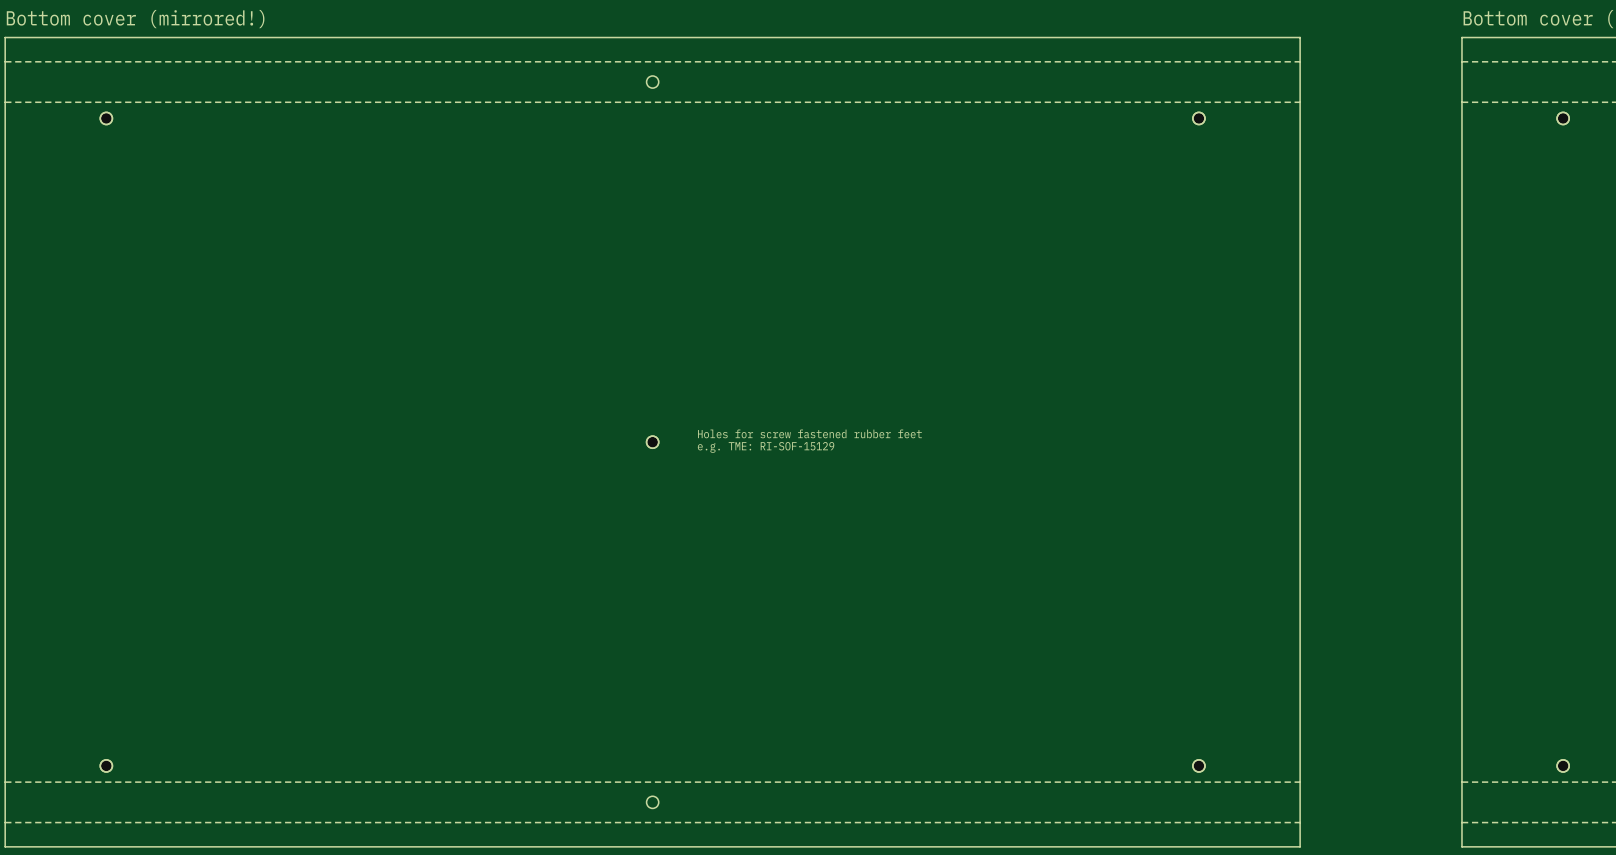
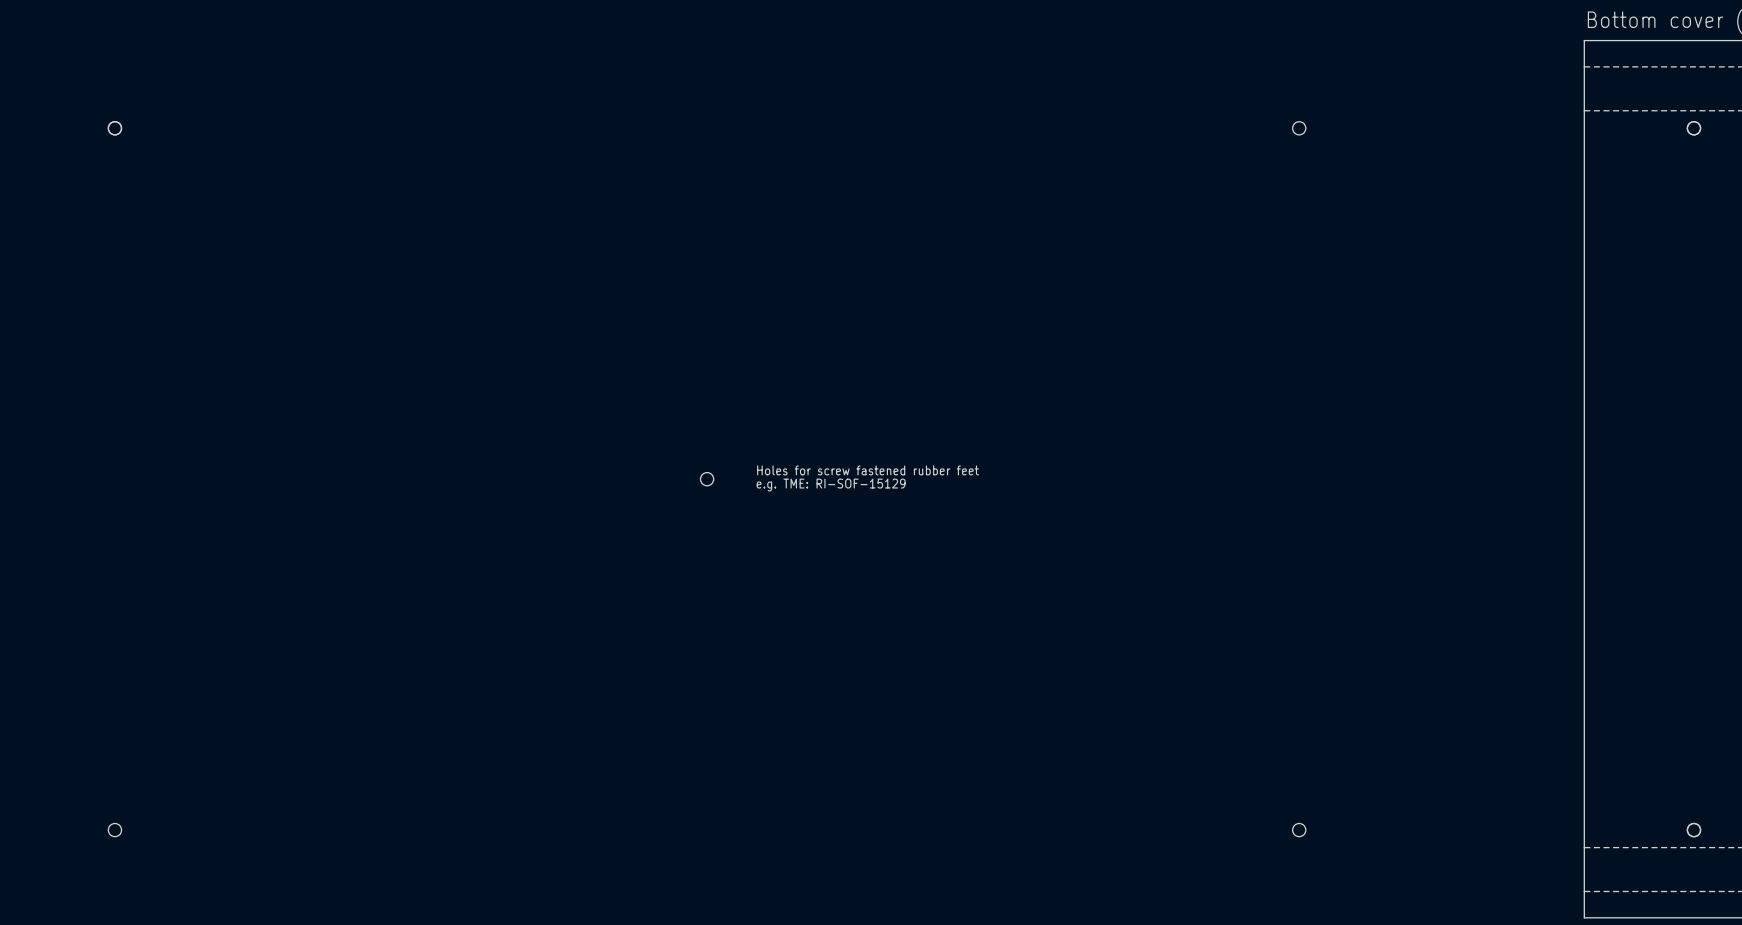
text: Bottom cover (mirrored!) (135, 19) -> none
board edge: (5, 37) (1300, 37) (1300, 846) (5, 846) (5, 37) -> none
board edge: (5, 61) (1300, 61) -> none
round board edge: [646, 75, 659, 89] -> none
board edge: (5, 102) (1300, 102) -> none
hole: (1198, 118) -> none
hole: (652, 442) -> none
hole: (106, 765) -> none
hole: (1198, 765) -> none
board edge: (5, 782) (1300, 782) -> none
round board edge: [646, 796, 659, 809] -> none
board edge: (5, 822) (1300, 822) -> none

